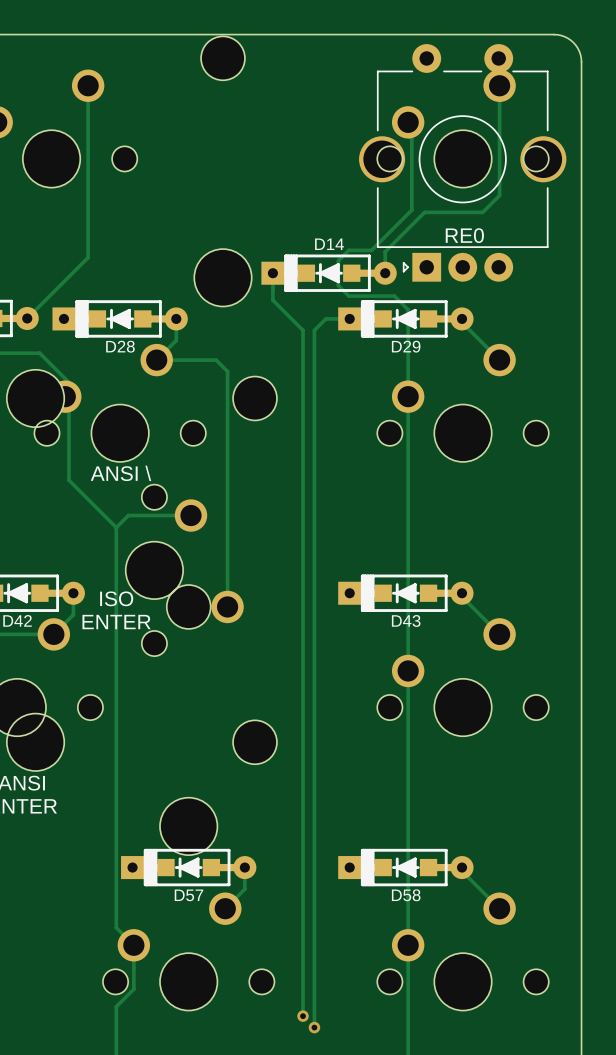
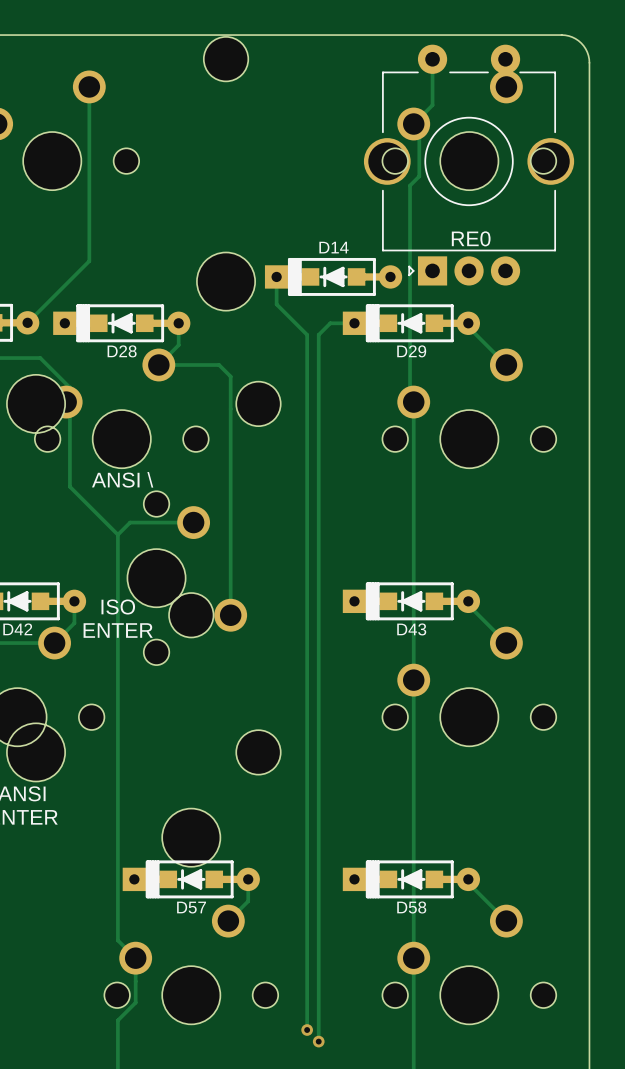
track: none -> (432, 59) (432, 105) (413, 124)
track: (499, 85) (499, 195) (482, 212) (424, 212) (385, 251) (385, 273) -> none
track: (408, 131) (408, 135) (411, 139) (411, 210) (371, 250) (348, 250) (338, 260) (338, 285) (348, 296) (394, 296) (408, 309) (408, 386) -> (413, 133) (419, 139) (419, 176) (410, 185) (410, 387) (413, 391)

